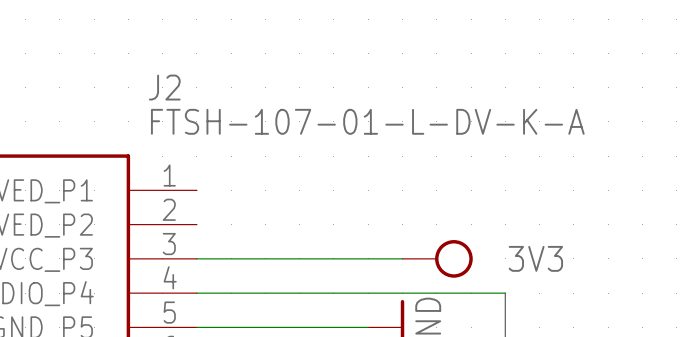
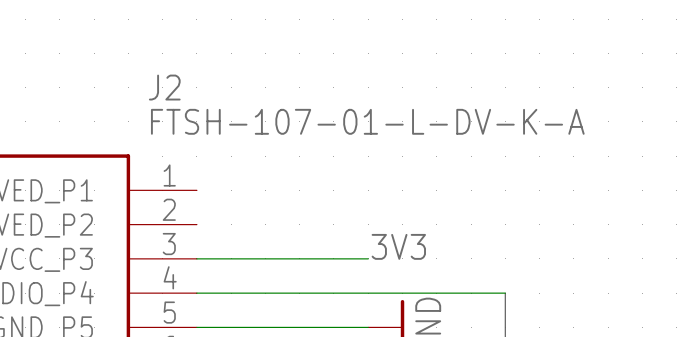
label: none -> 3V3 (398, 246)
wire: (368, 258) (402, 258) -> none
power symbol: 3V3 (437, 258) -> none

